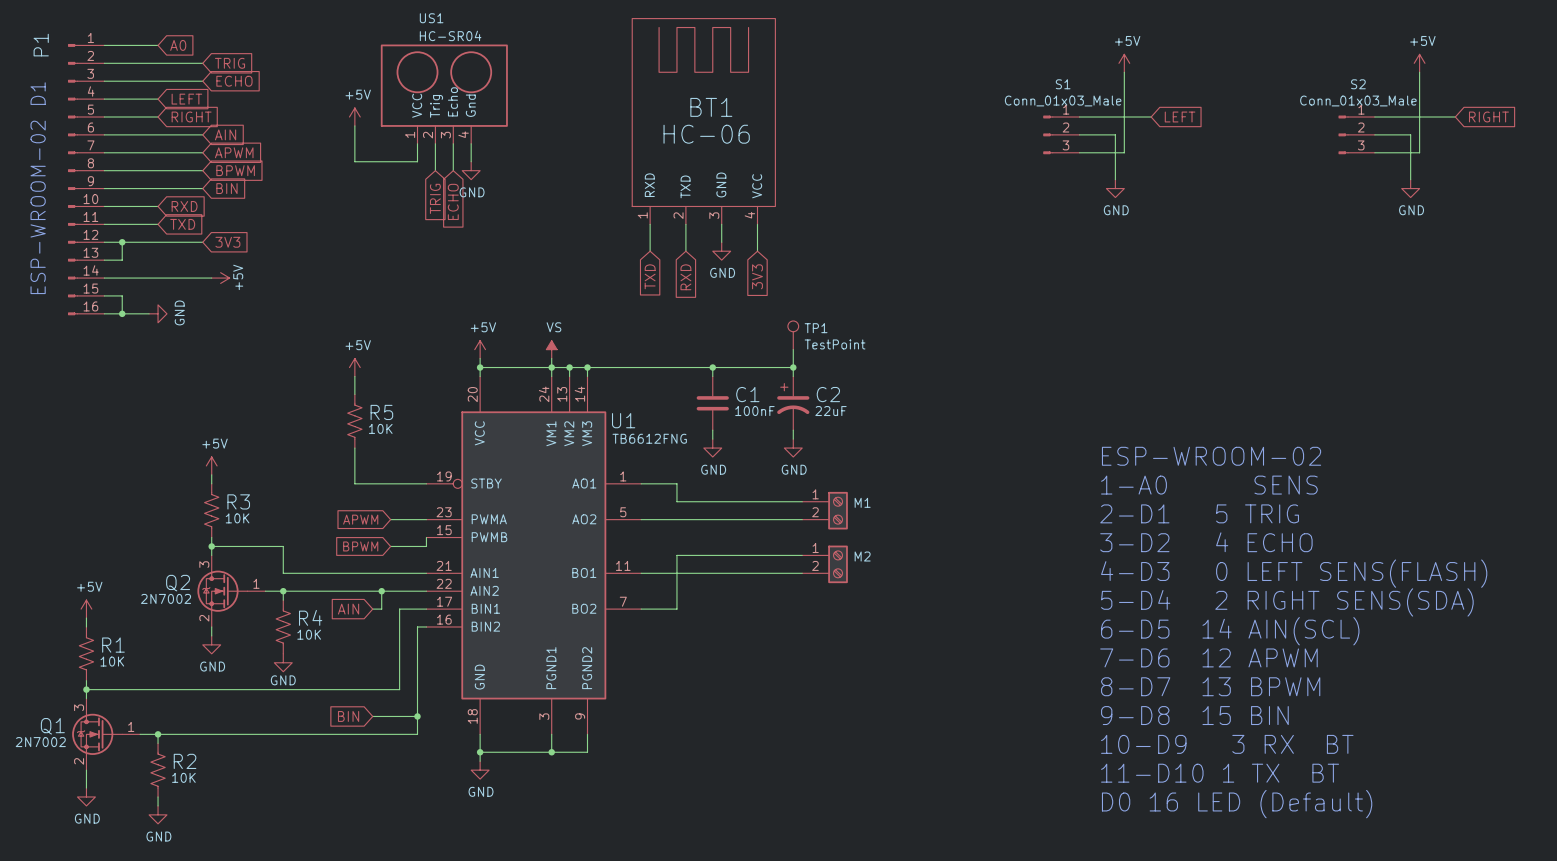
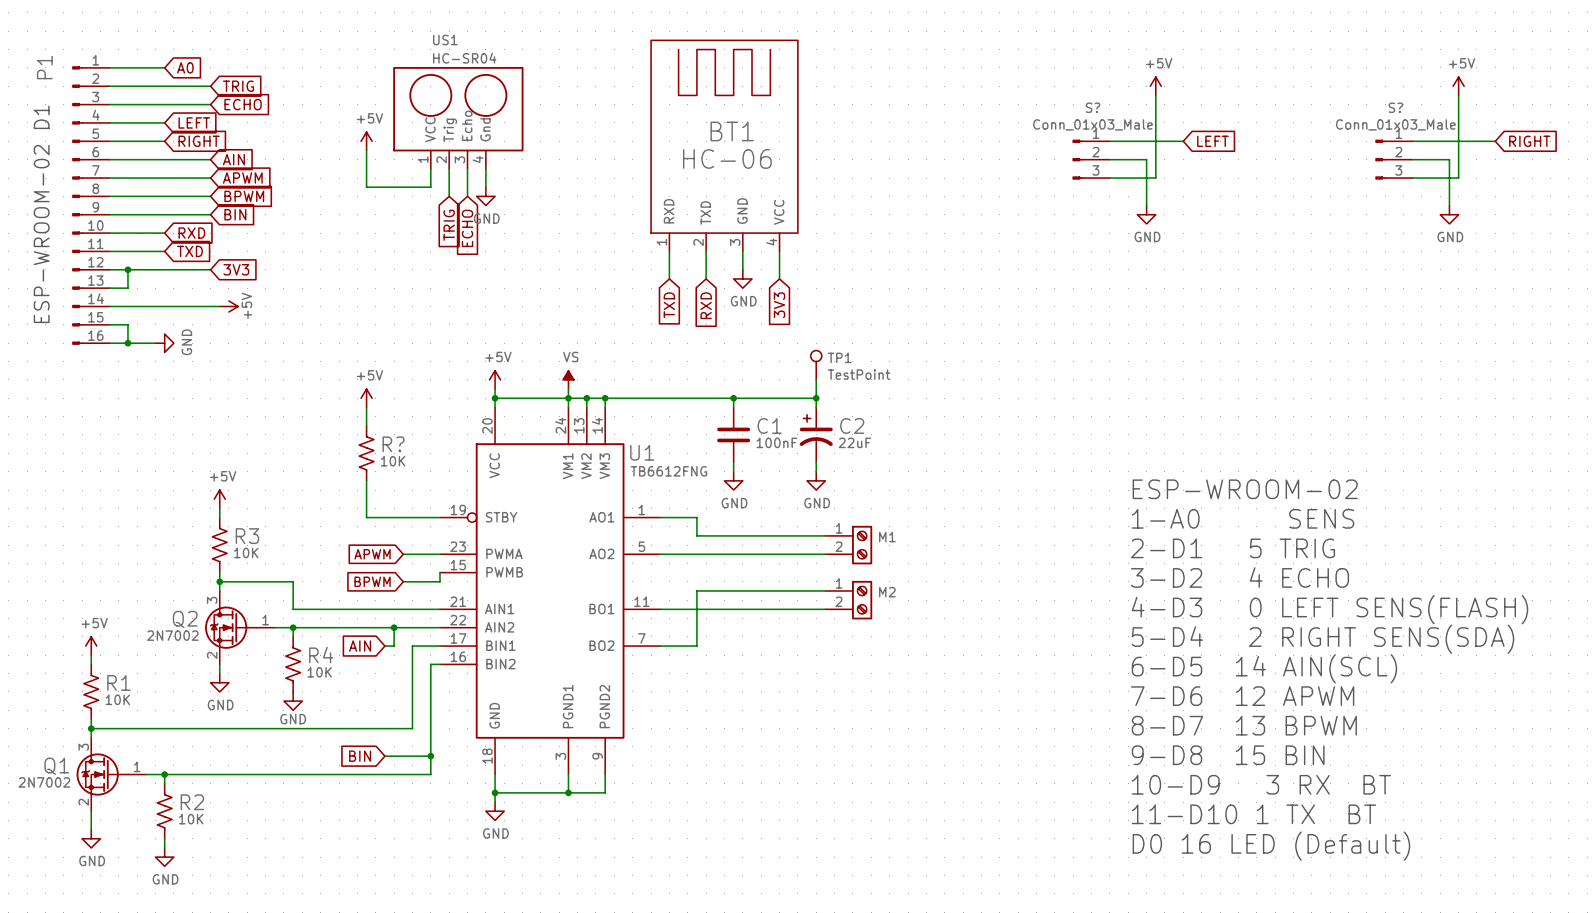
S1 name: S1 (1063, 84) -> S? (1093, 107)
S2 name: S2 (1358, 84) -> S? (1395, 107)
R5 name: R5 (381, 412) -> R? (393, 444)

